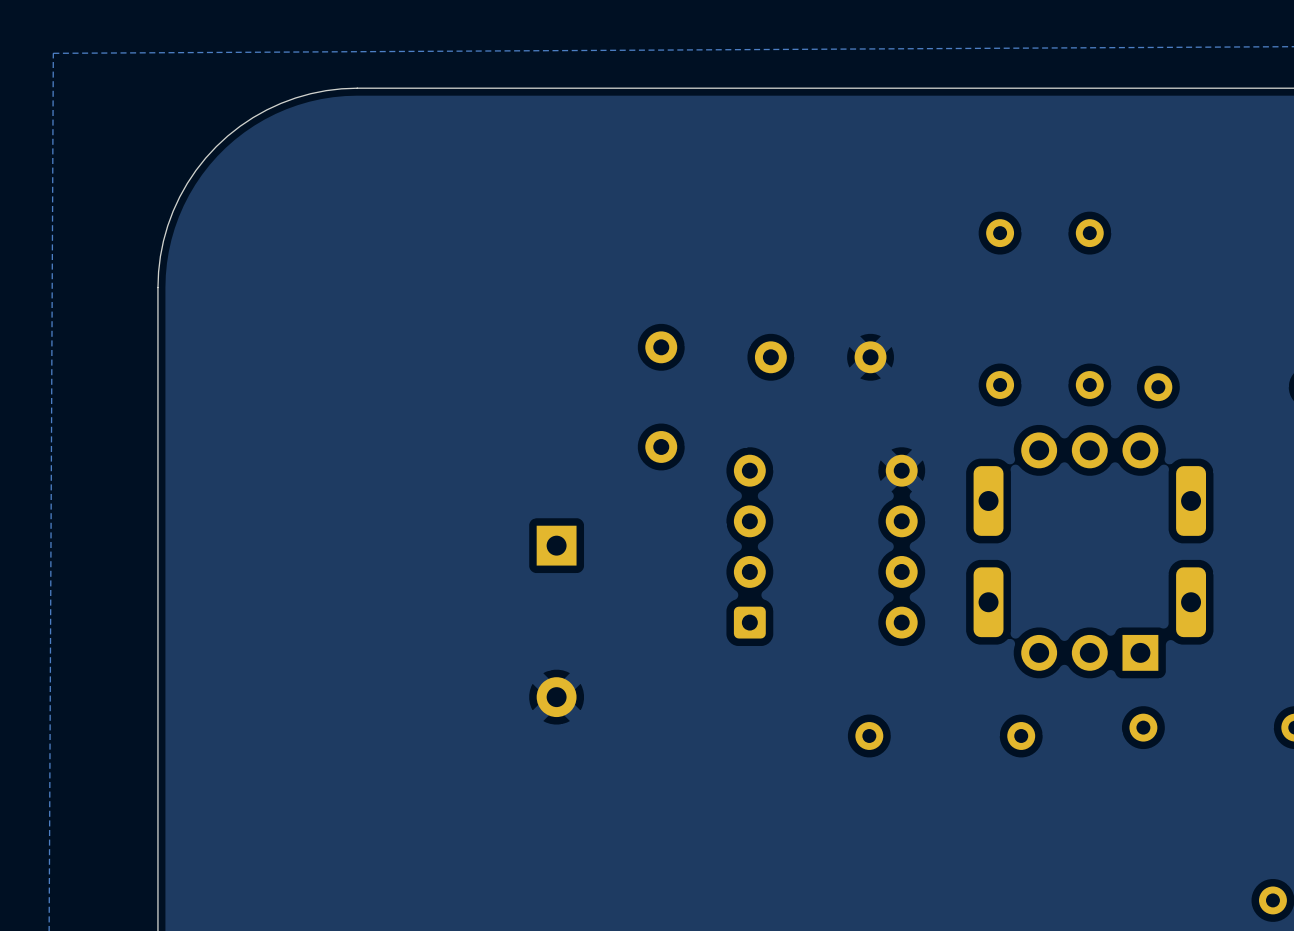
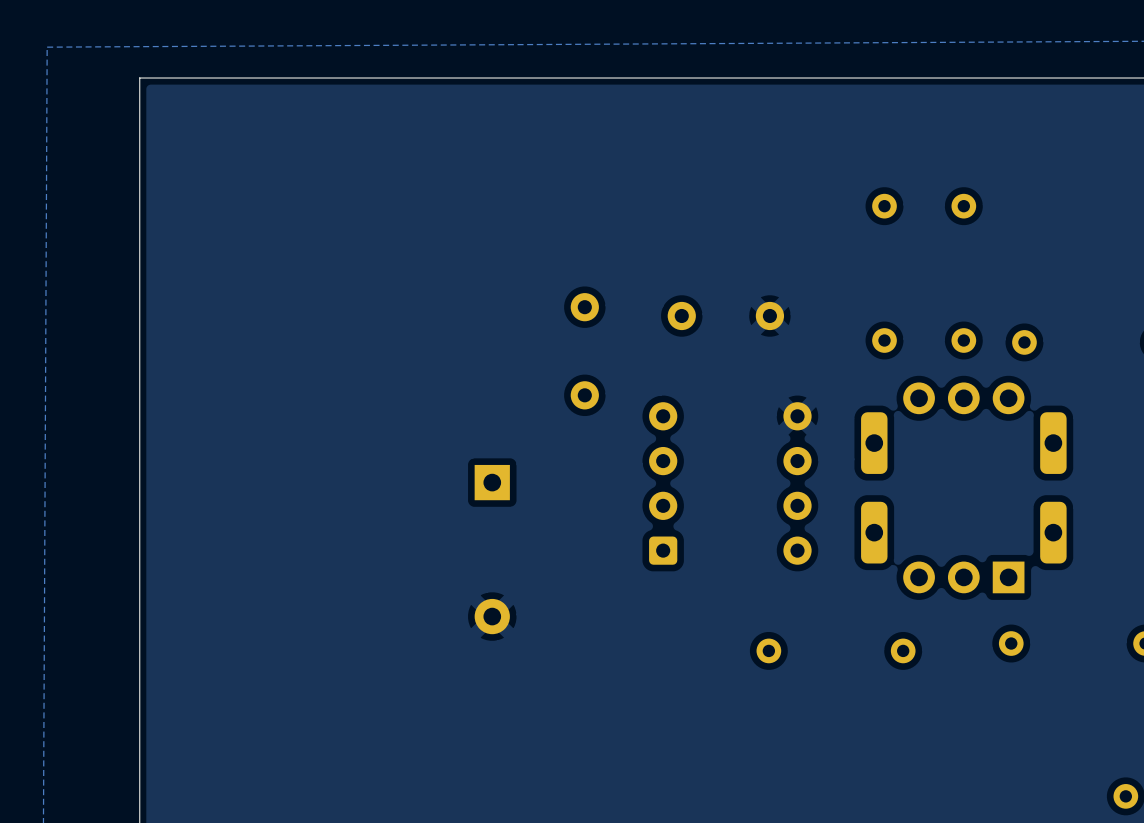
board edge: (357, 88) (310, 93) (281, 103) (253, 117) (216, 146) (187, 183) (173, 211) (160, 256) (157, 287) -> (315, 78) (139, 78) (139, 254)

